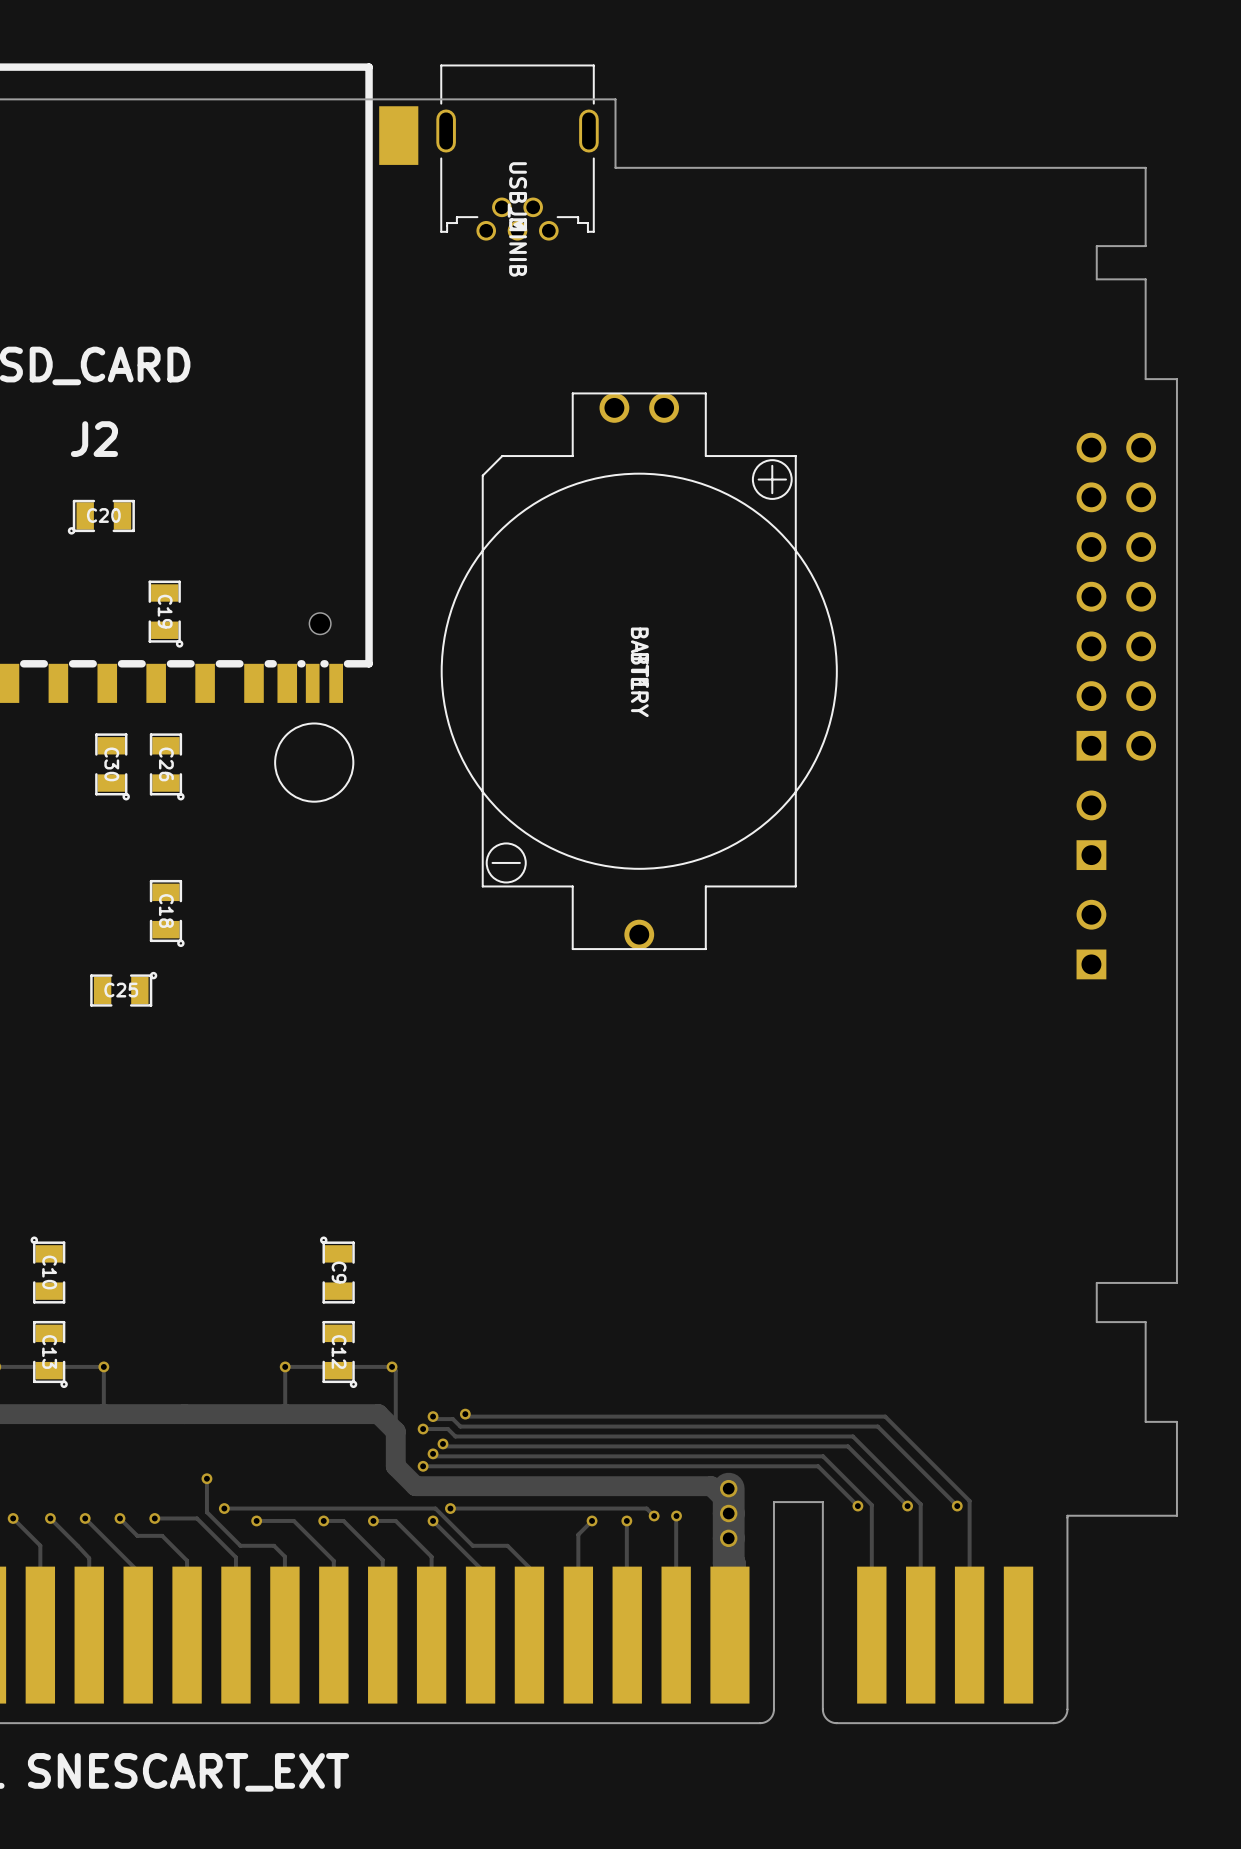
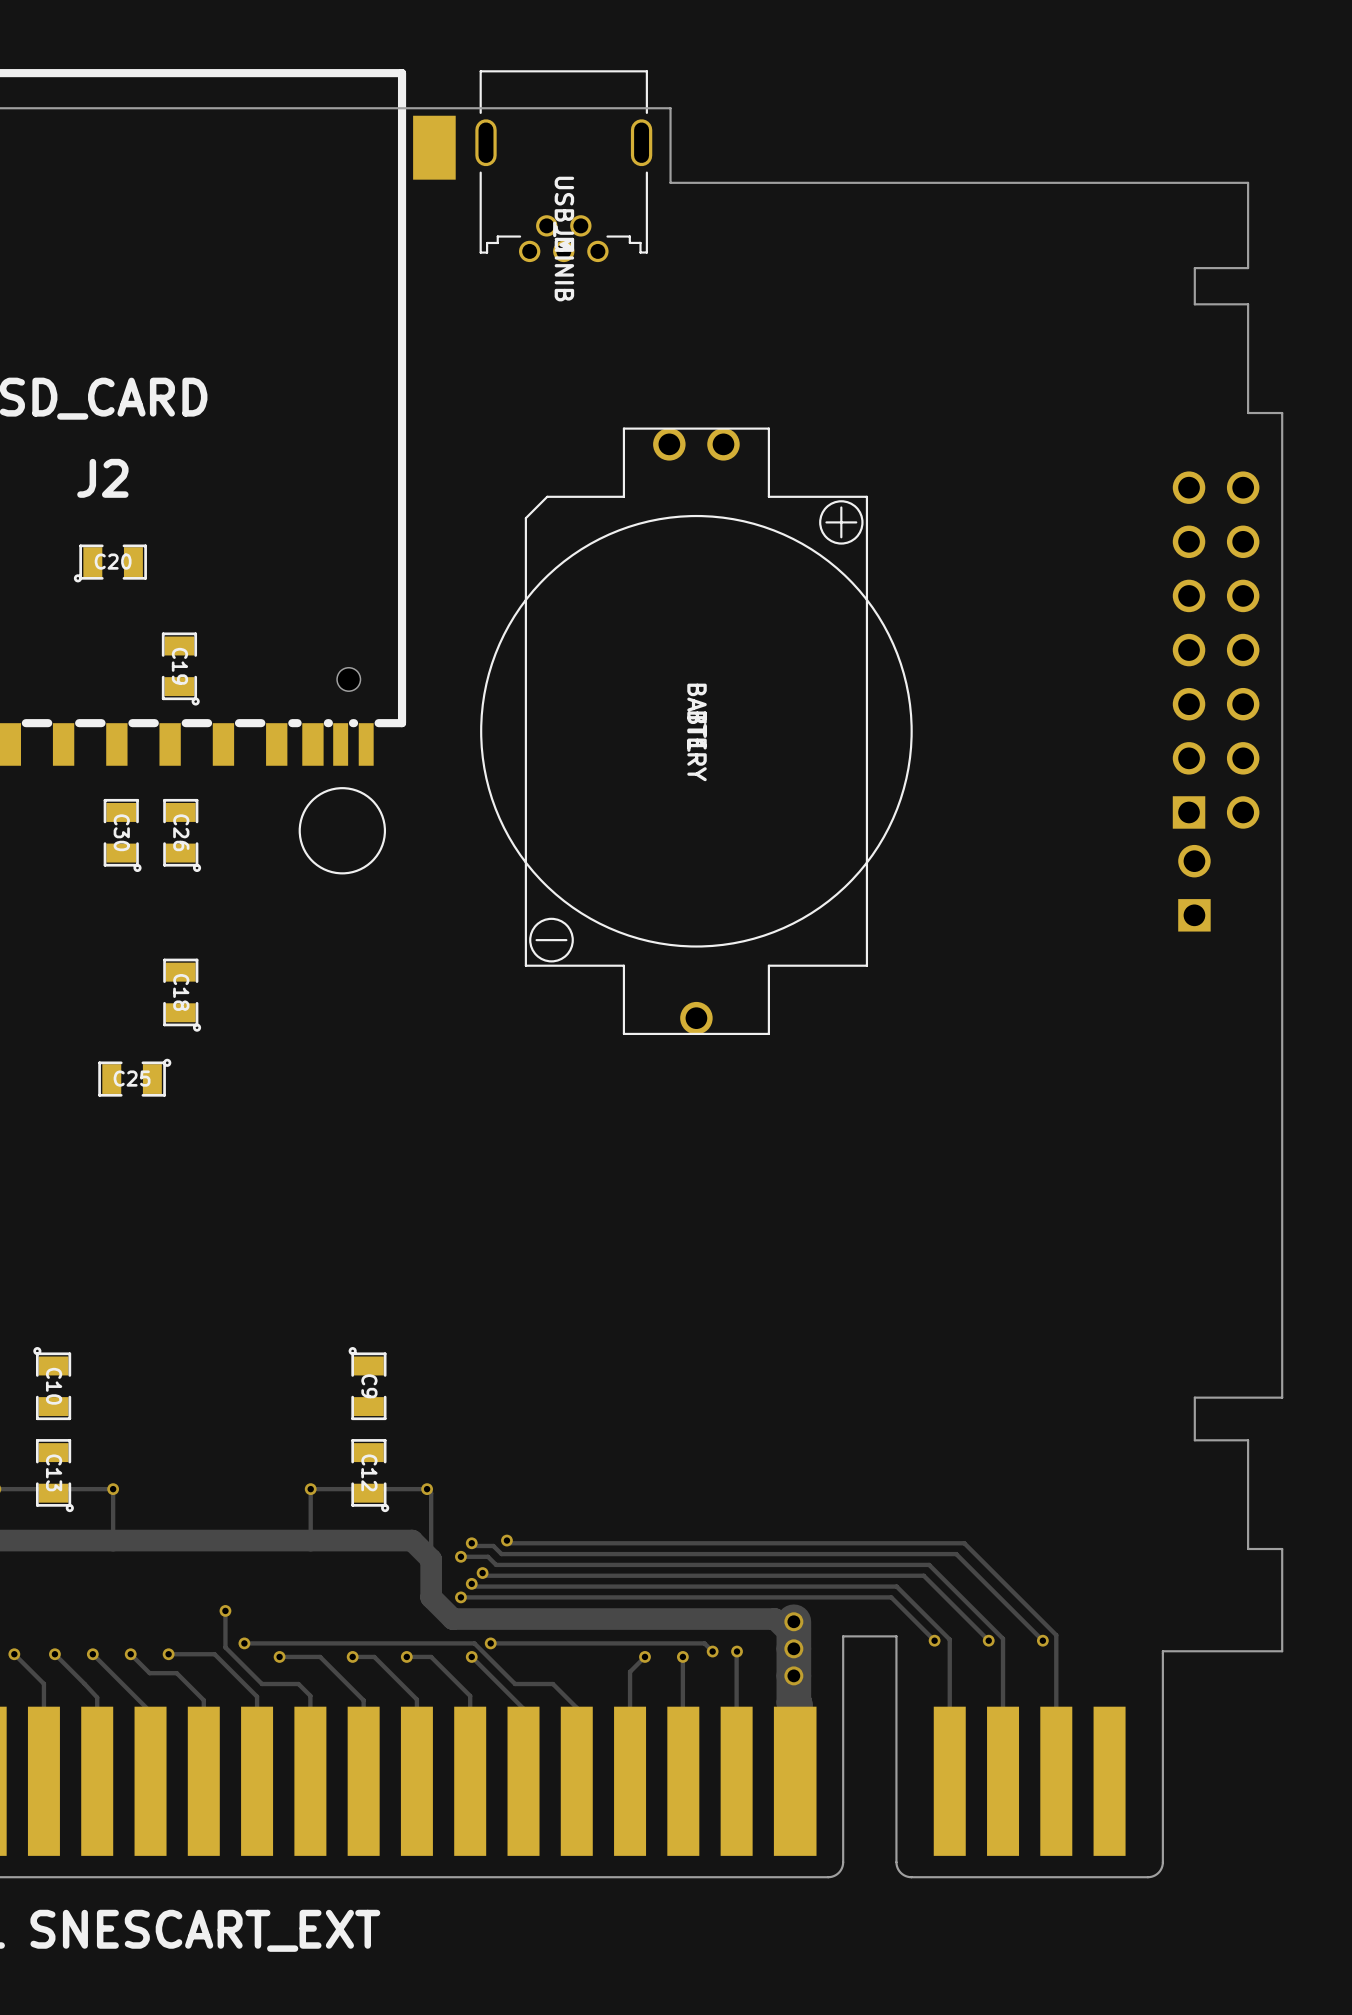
part position: (1091, 830) -> (1194, 888)
part: (1091, 939) -> none

